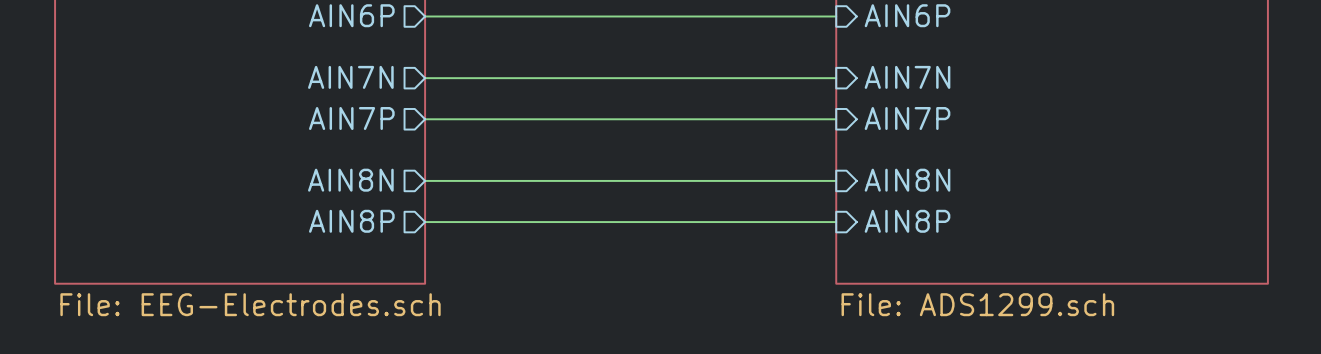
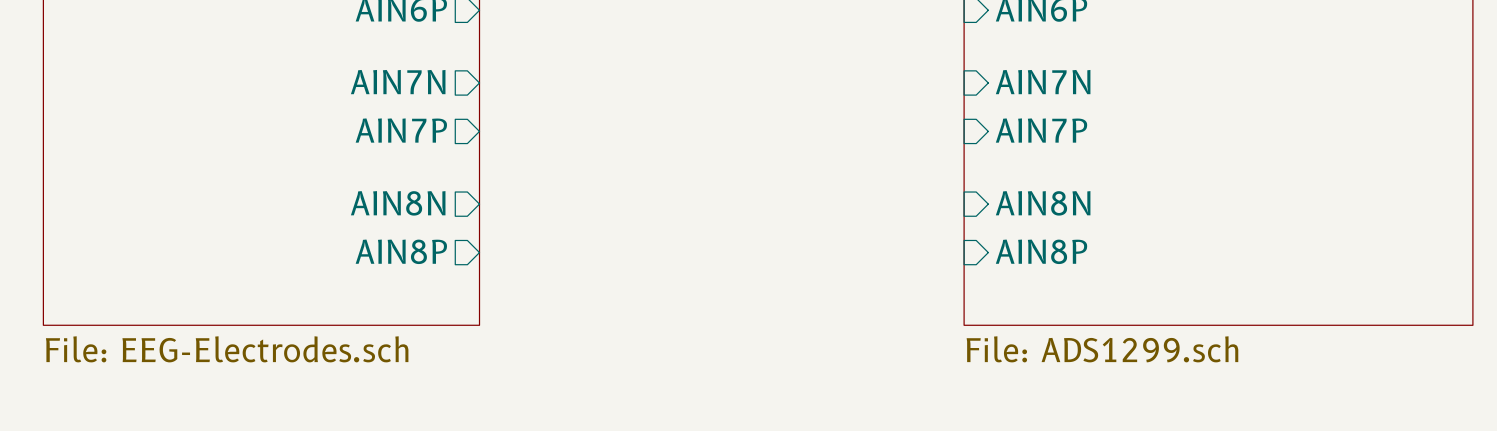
wire: (425, 16) (836, 16) -> none
wire: (425, 78) (836, 78) -> none
wire: (425, 119) (836, 119) -> none
wire: (425, 180) (836, 180) -> none
wire: (425, 222) (836, 222) -> none

